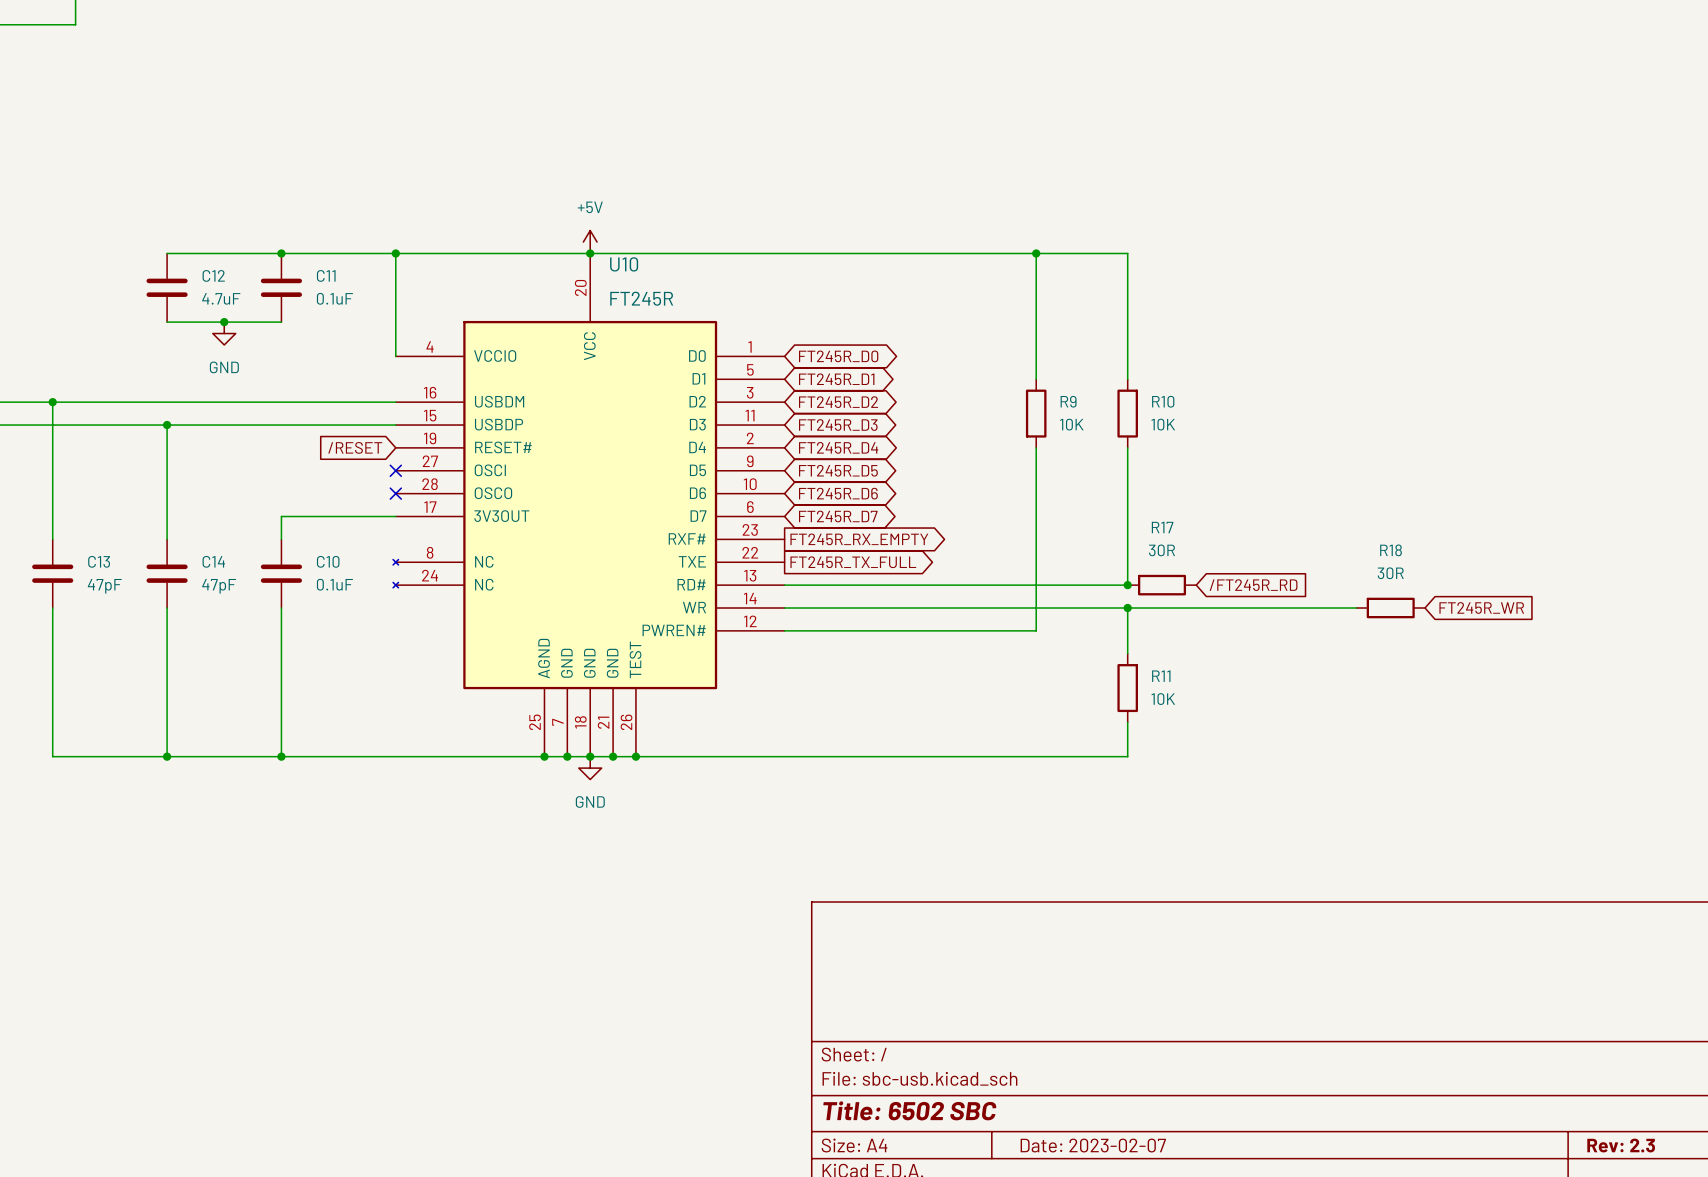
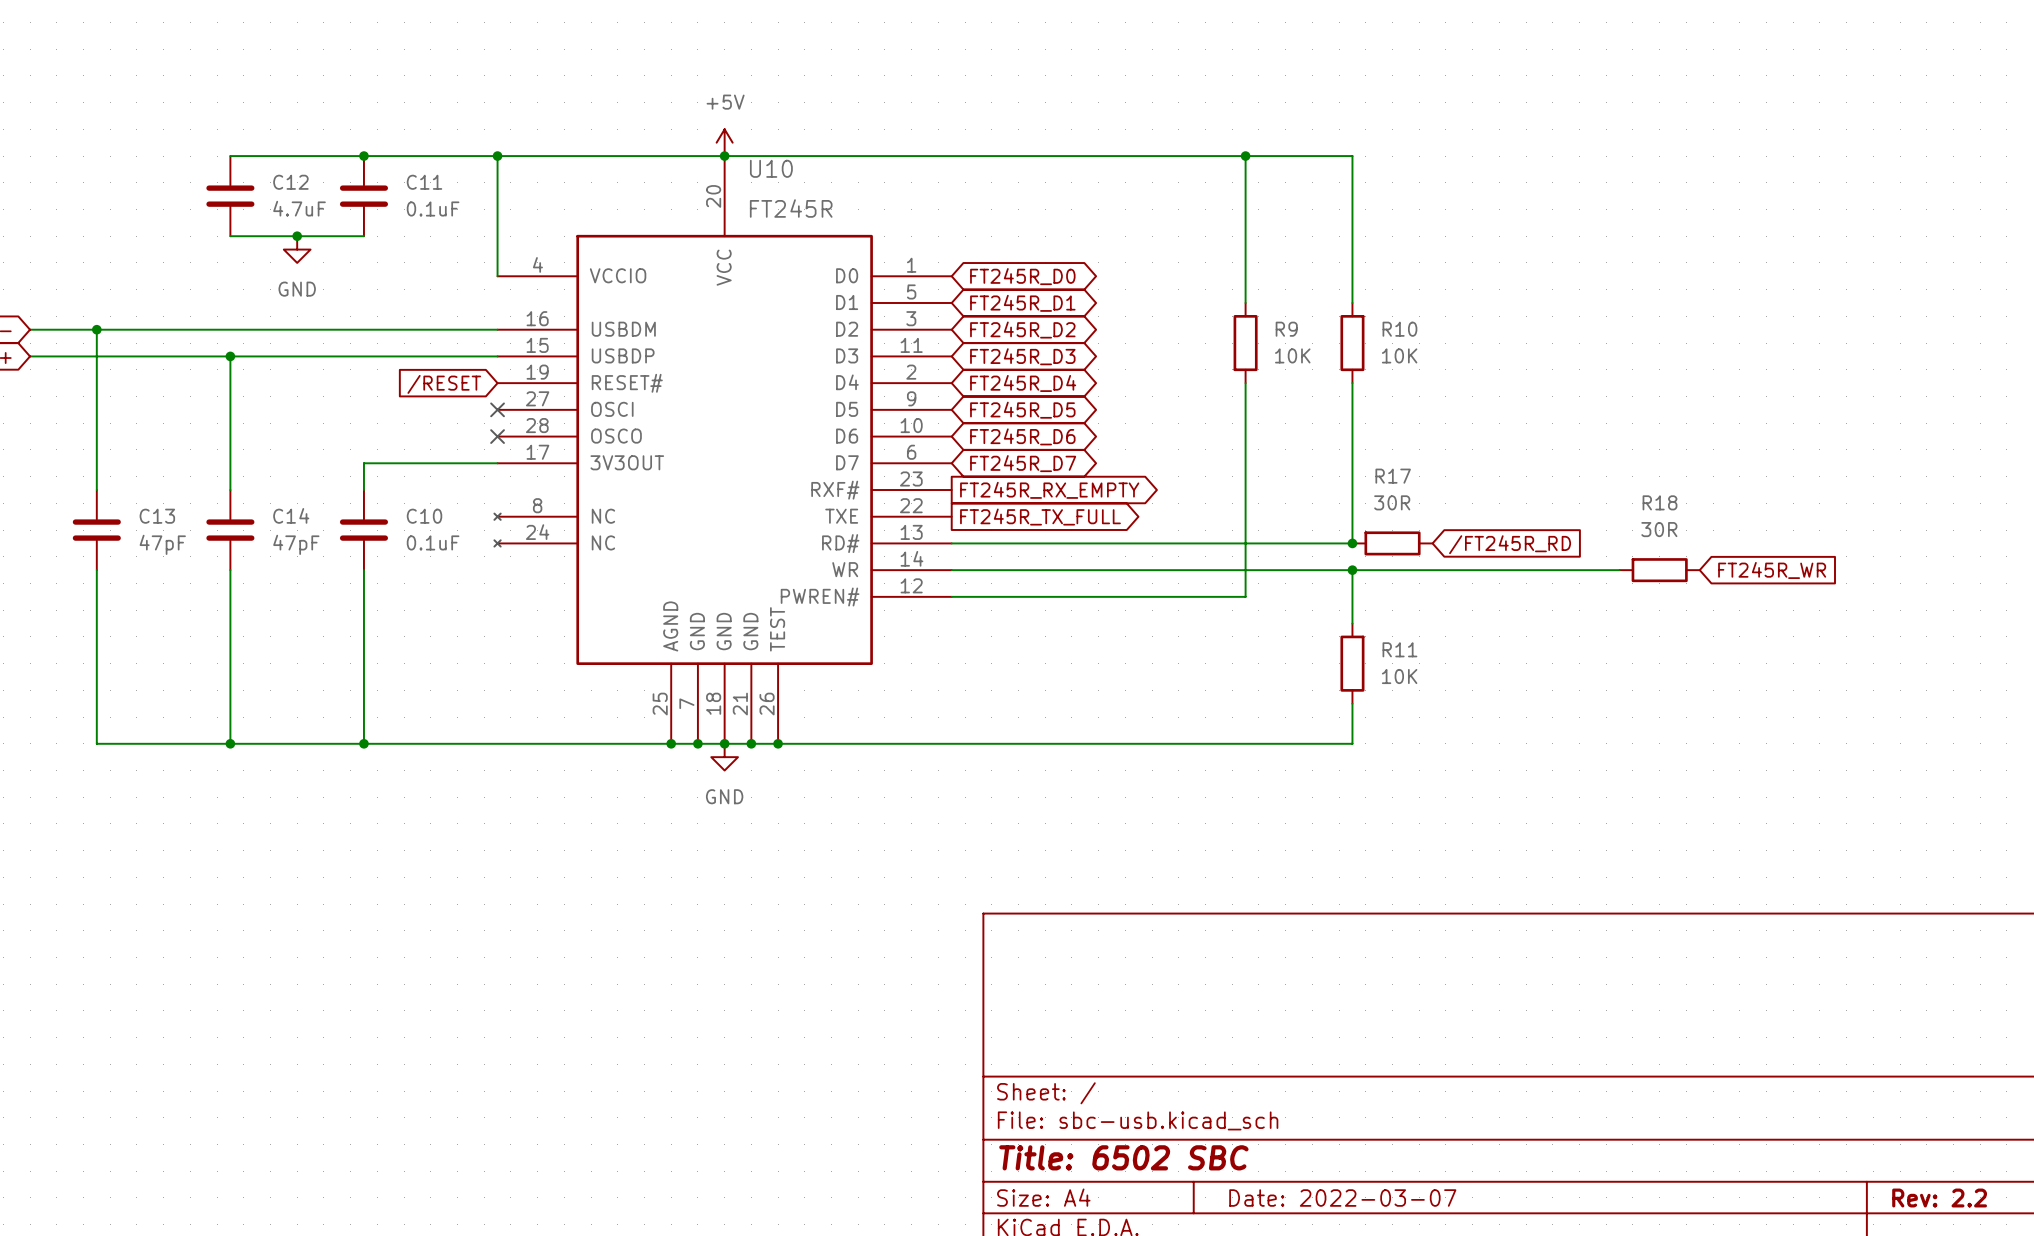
title block: Date: 2023-02-07 (1093, 1145) -> Date: 2022-03-07 (1342, 1198)
title block: Rev: 2.3 (1621, 1145) -> Rev: 2.2 (1939, 1198)

